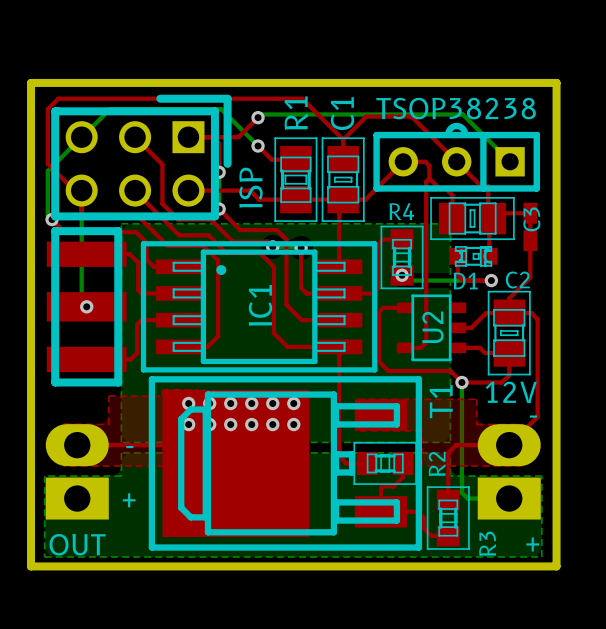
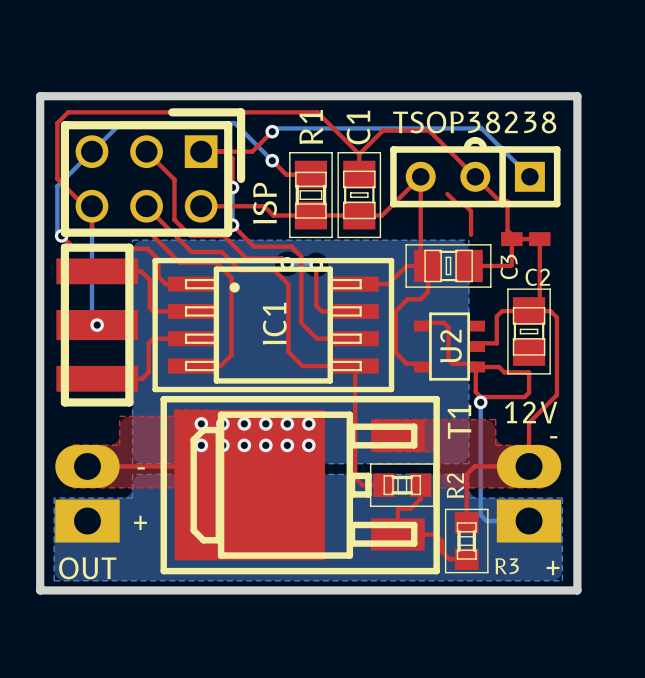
top track: (403, 161) (425, 161) (429, 165) (429, 178) (426, 181) (426, 342) (420, 347) (404, 347) -> (420, 176) (420, 258) (428, 265)
top track: (343, 199) (339, 203) (339, 266) -> (428, 265) (406, 265) (388, 284) (355, 284)
C3 position: (472, 218) -> (448, 265)
part rotation: 0° (530, 226) -> 90° clockwise (525, 239)
top track: (402, 239) (383, 239) (377, 244) (377, 288) (373, 293) (339, 293) -> none
top track: none -> (468, 265) (510, 265) (511, 239) (539, 239) (539, 300) (529, 311)
top track: (457, 256) (457, 275) (463, 280) (491, 280) -> none
D1: (473, 256) -> none
top track: (489, 256) (489, 221) (497, 213) (530, 213) (530, 277) (509, 298) (509, 313) -> none
R4: (402, 257) -> none
bottom track: (402, 275) (407, 280) (491, 280) -> none
via: (402, 275) -> none
via: (491, 280) -> none
top track: (404, 307) (383, 307) (378, 312) -> (428, 265) (428, 291) (420, 299) (407, 299) (395, 311) (395, 330)
top track: (458, 327) (471, 327) (486, 313) (531, 313) (537, 319) (537, 416) (509, 445) -> (475, 343) (496, 343) (496, 316) (502, 311) (550, 311) (556, 317) (556, 394) (529, 422) (529, 466)
C2 position: (509, 333) -> (529, 331)
top track: (378, 334) (378, 361) (388, 370) (450, 370) (461, 382) (501, 382) (509, 373) -> (421, 322) (444, 322) (448, 327) (448, 359) (452, 363) (475, 363) (475, 392) (480, 397) (524, 397) (529, 392)
top track: none -> (395, 353) (406, 363) (421, 363)
R3 name rotation: 0° (487, 543) -> 90° clockwise (507, 566)

